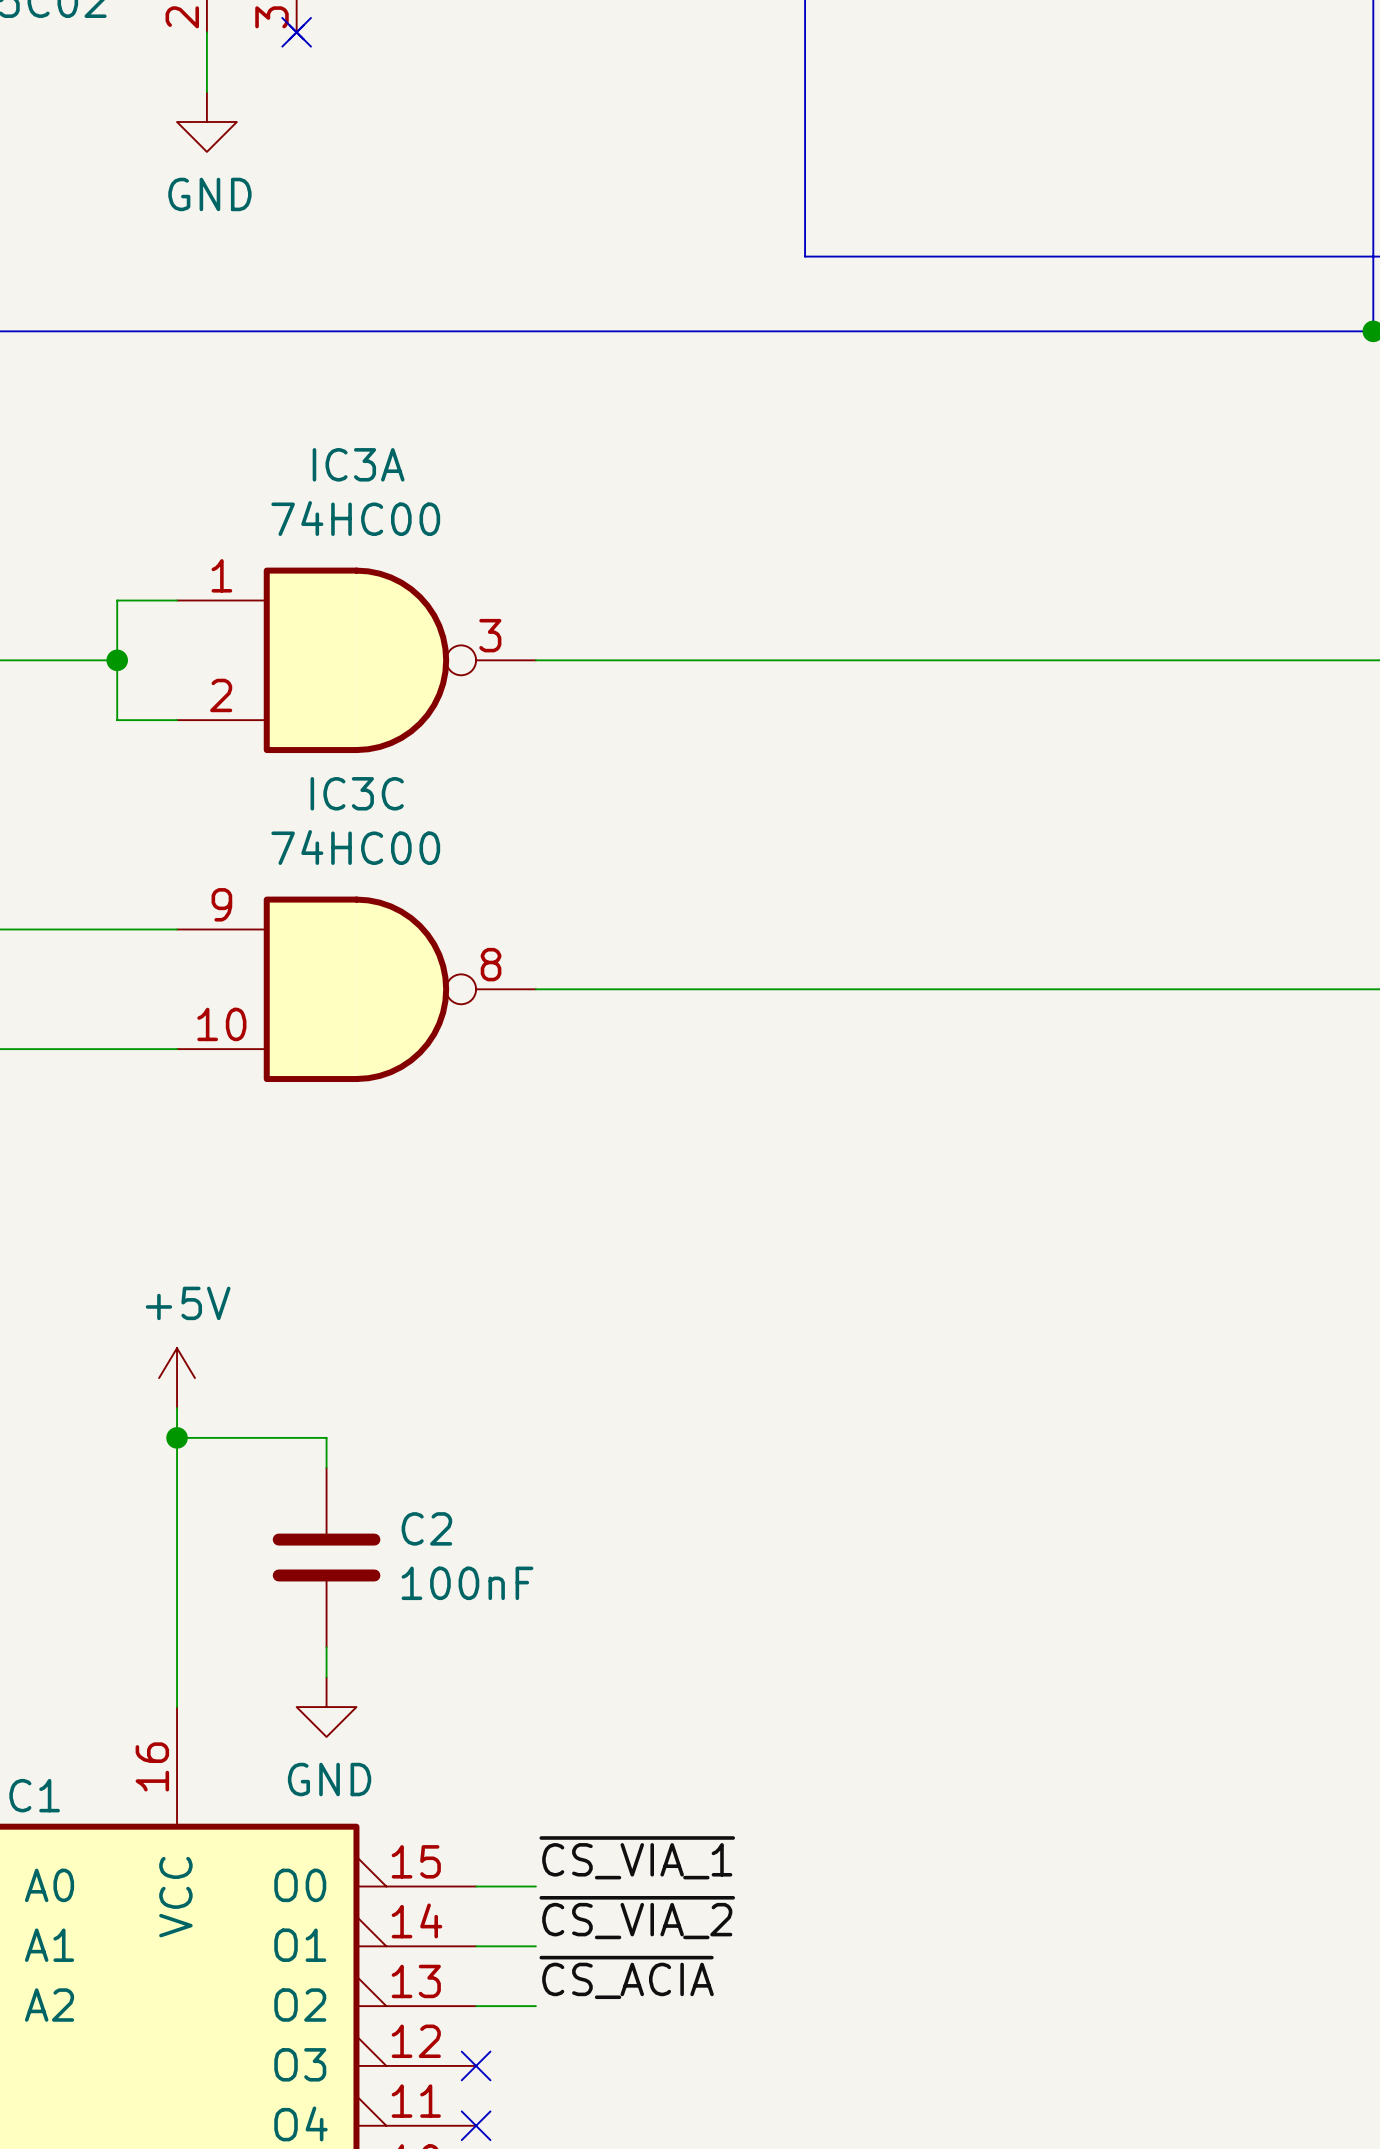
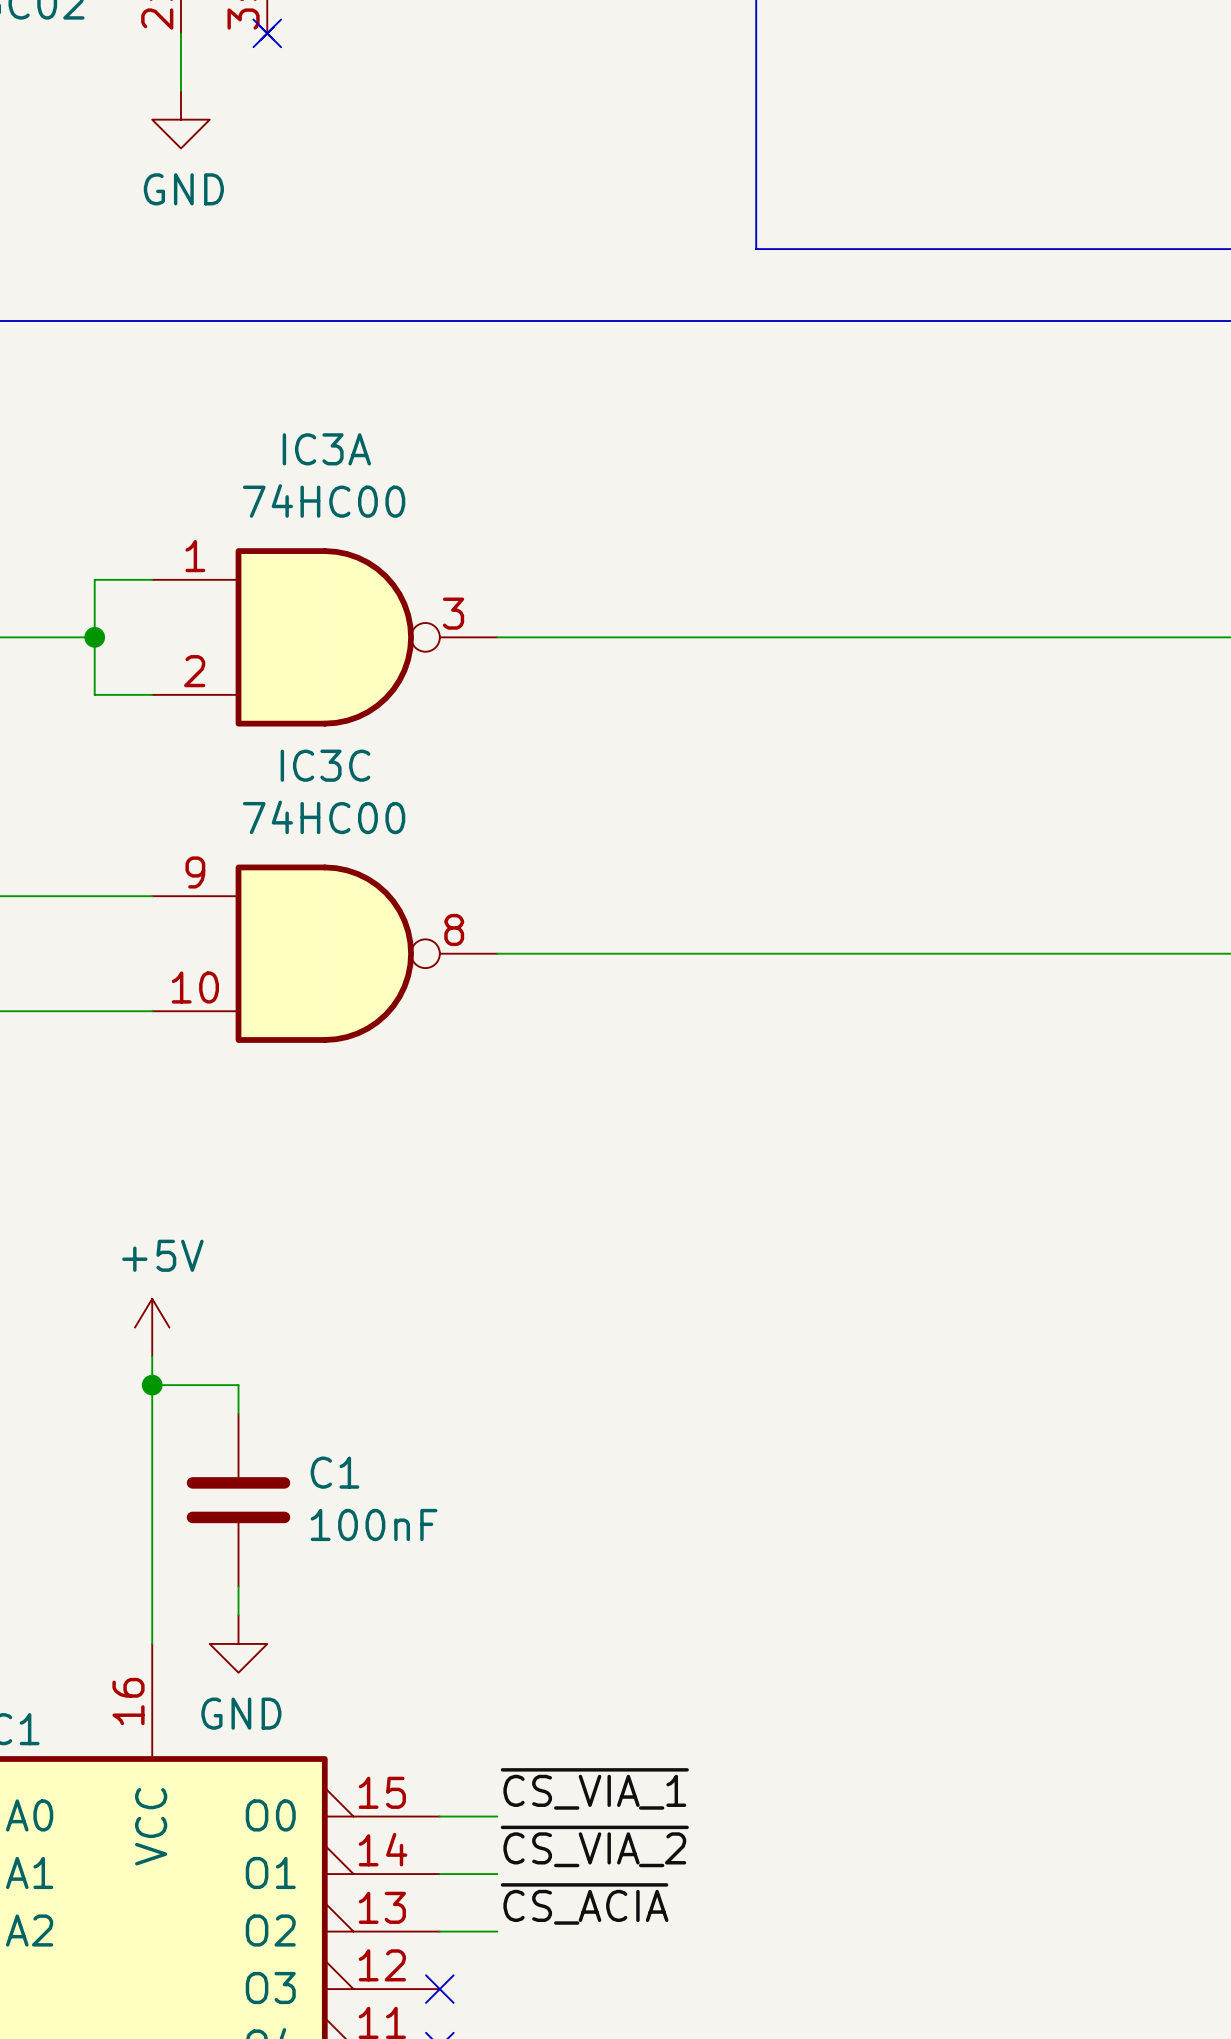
wire: (266, 1437) (326, 1437) (326, 1467) -> (238, 1385) (238, 1413)
C1: none -> 100nF (238, 1500)
C2: 100nF (326, 1557) -> none
wire: (326, 1647) (326, 1677) -> (238, 1586) (238, 1615)
power symbol position: GND (326, 1707) -> GND (238, 1643)

